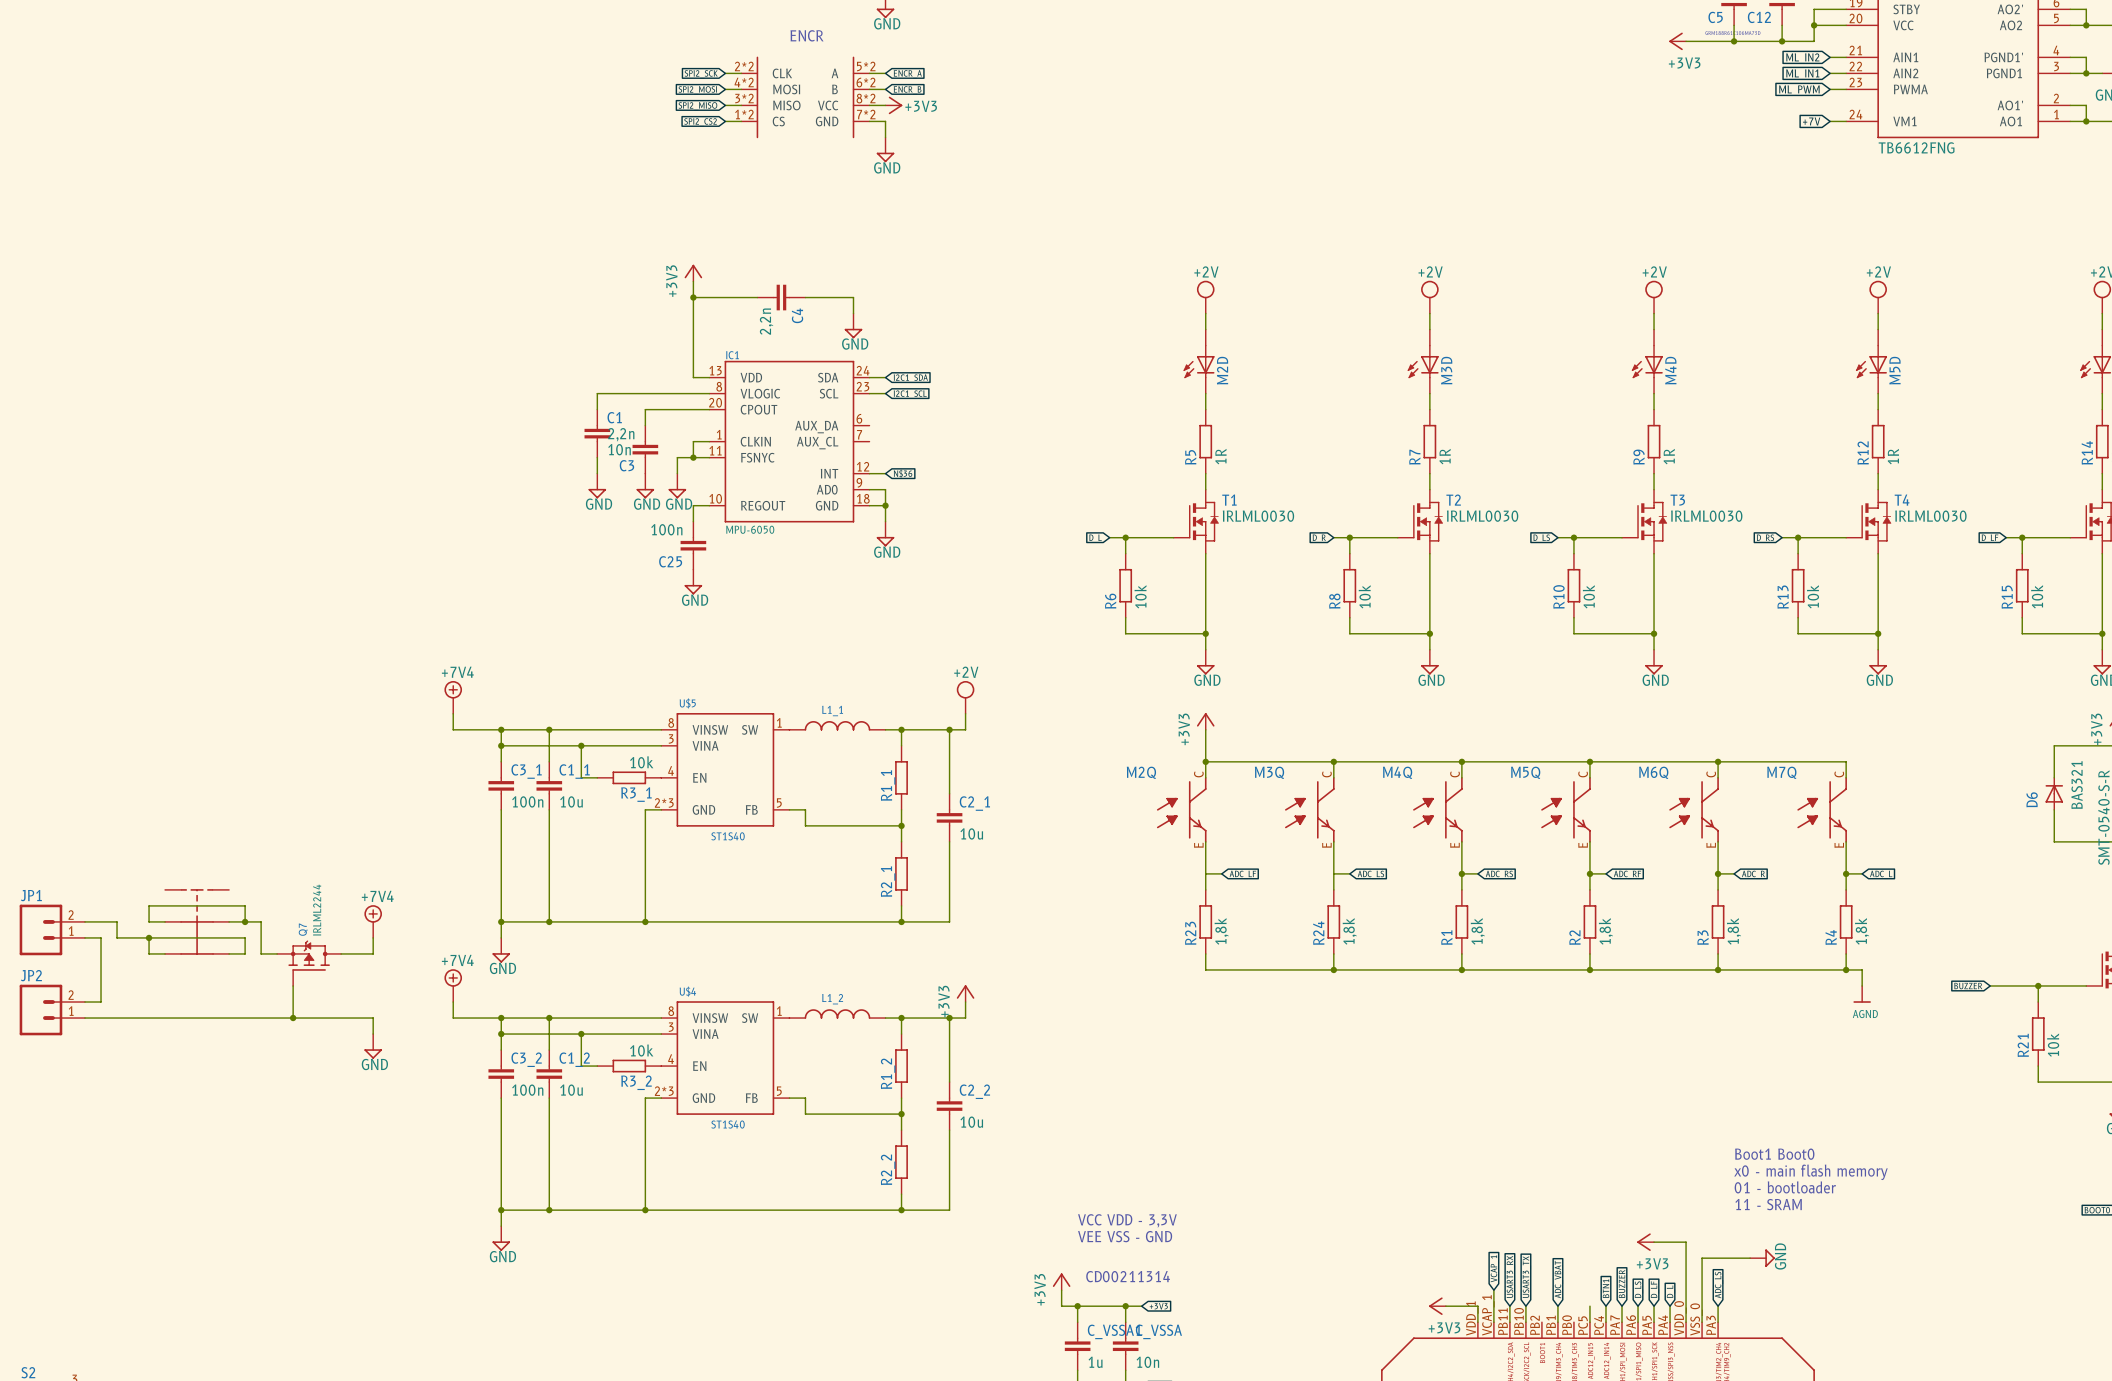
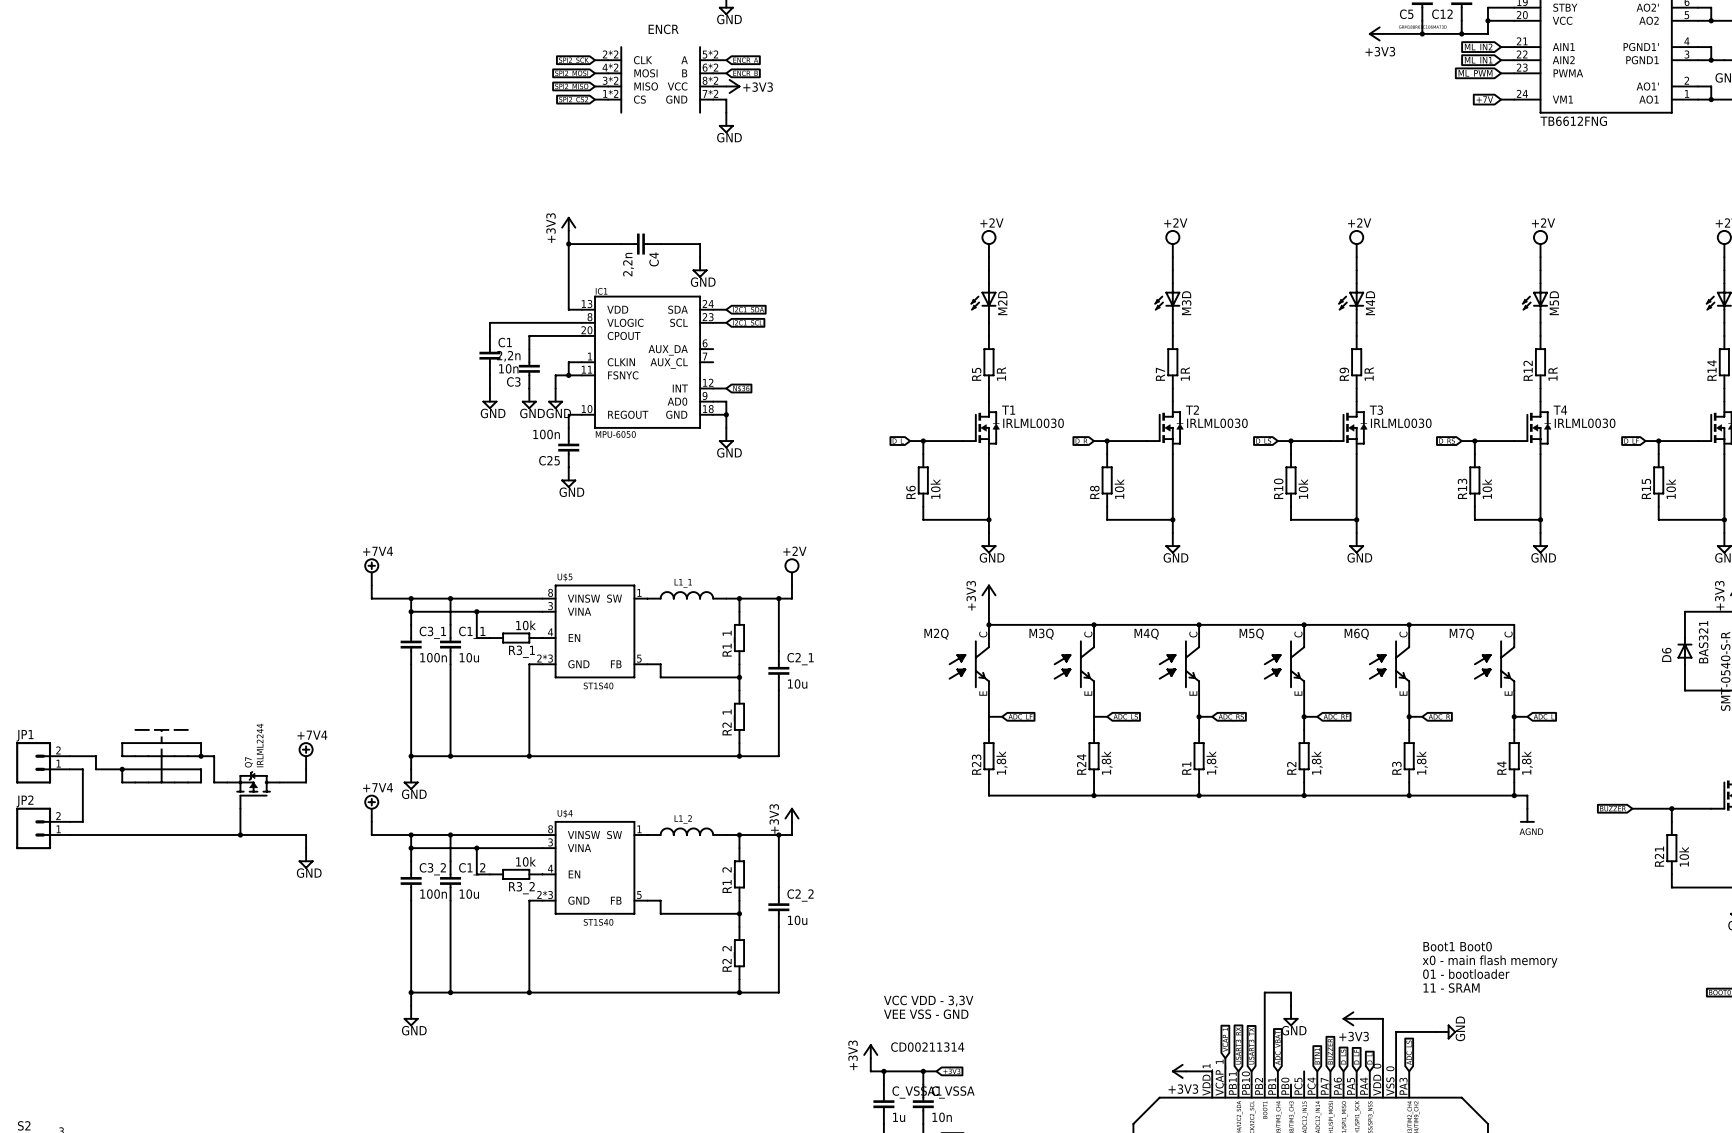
wire: none -> (1291, 1005) (1291, 992) (1264, 992) (1264, 1084)
power symbol: none -> GND (1291, 1015)

